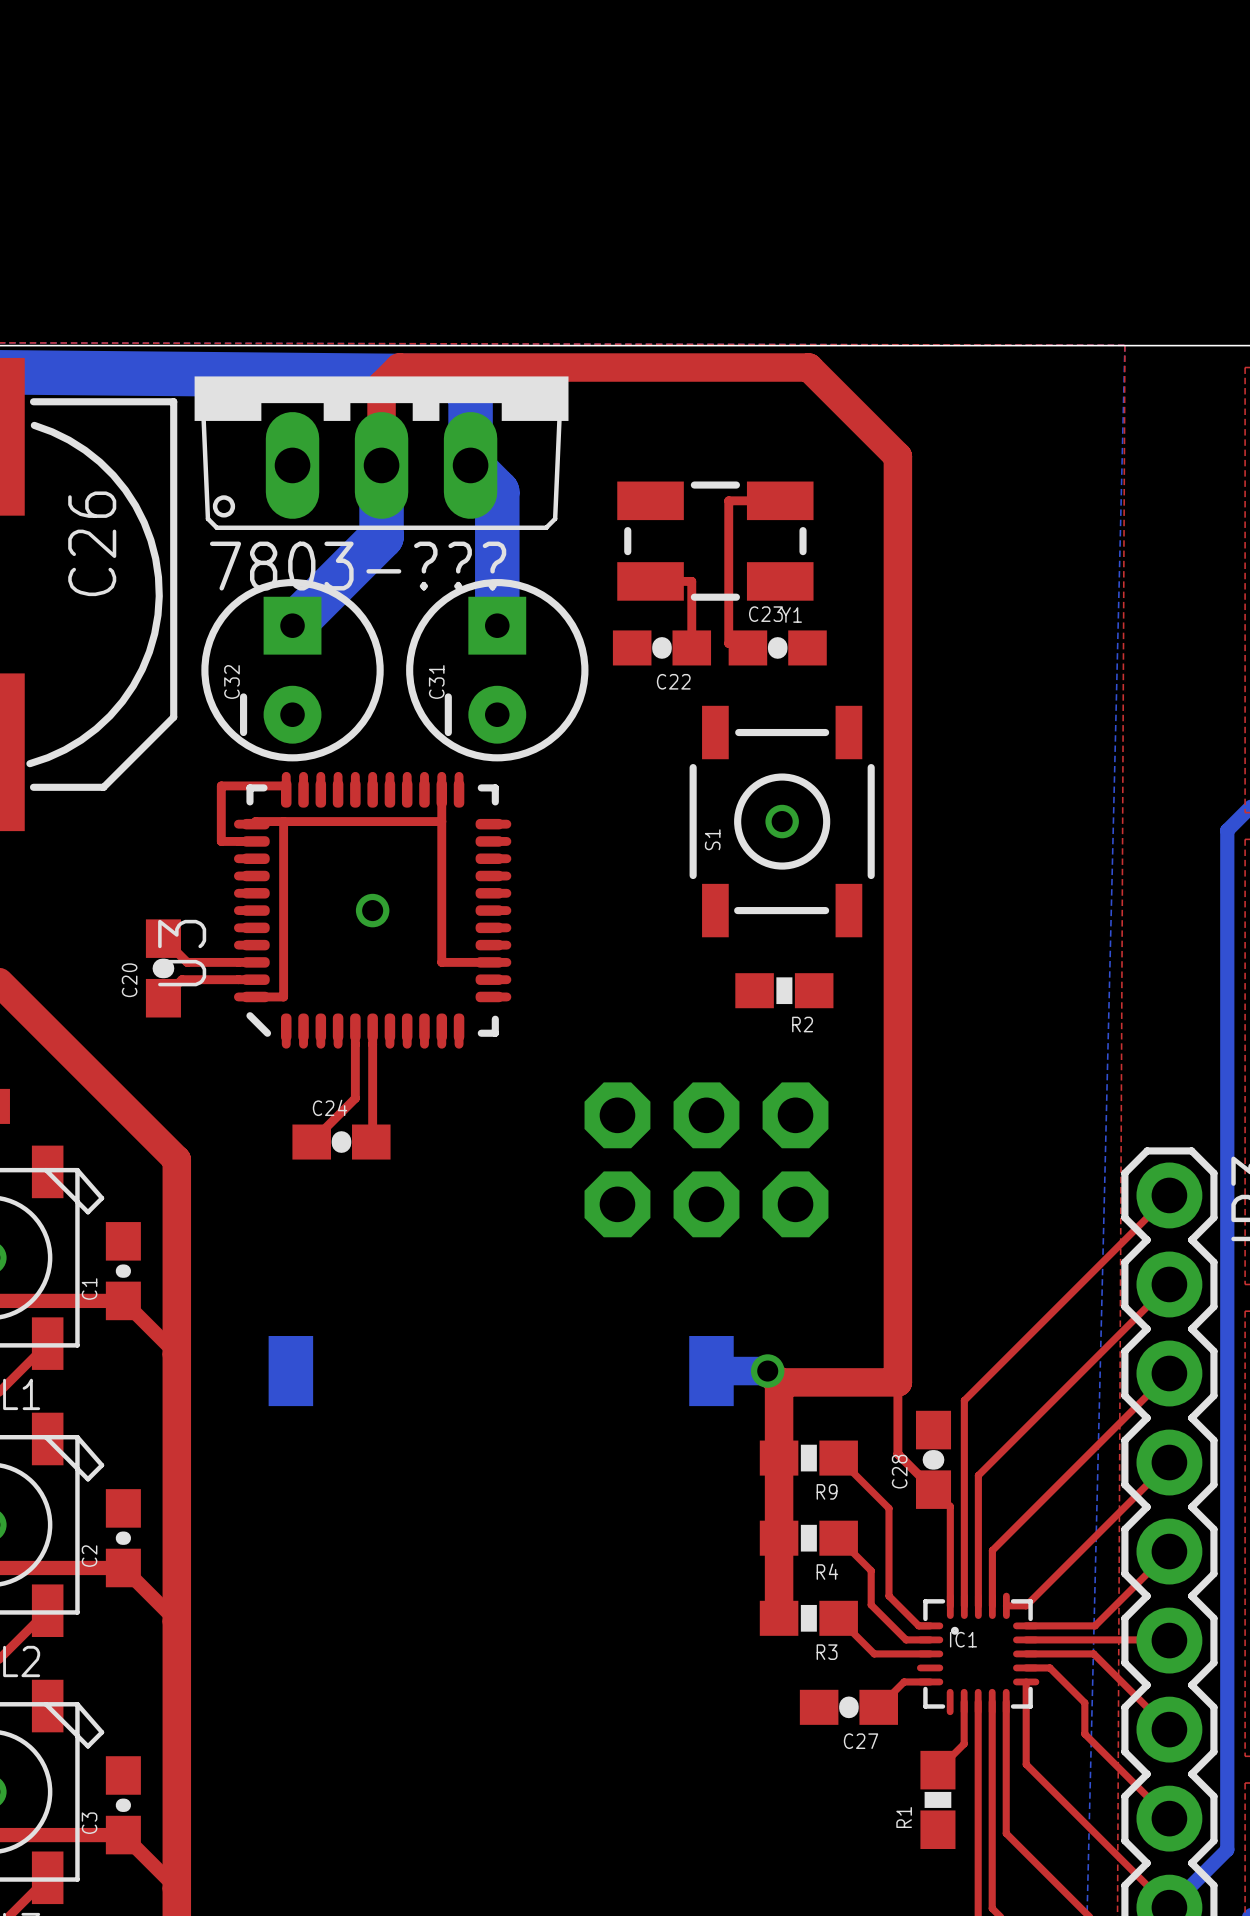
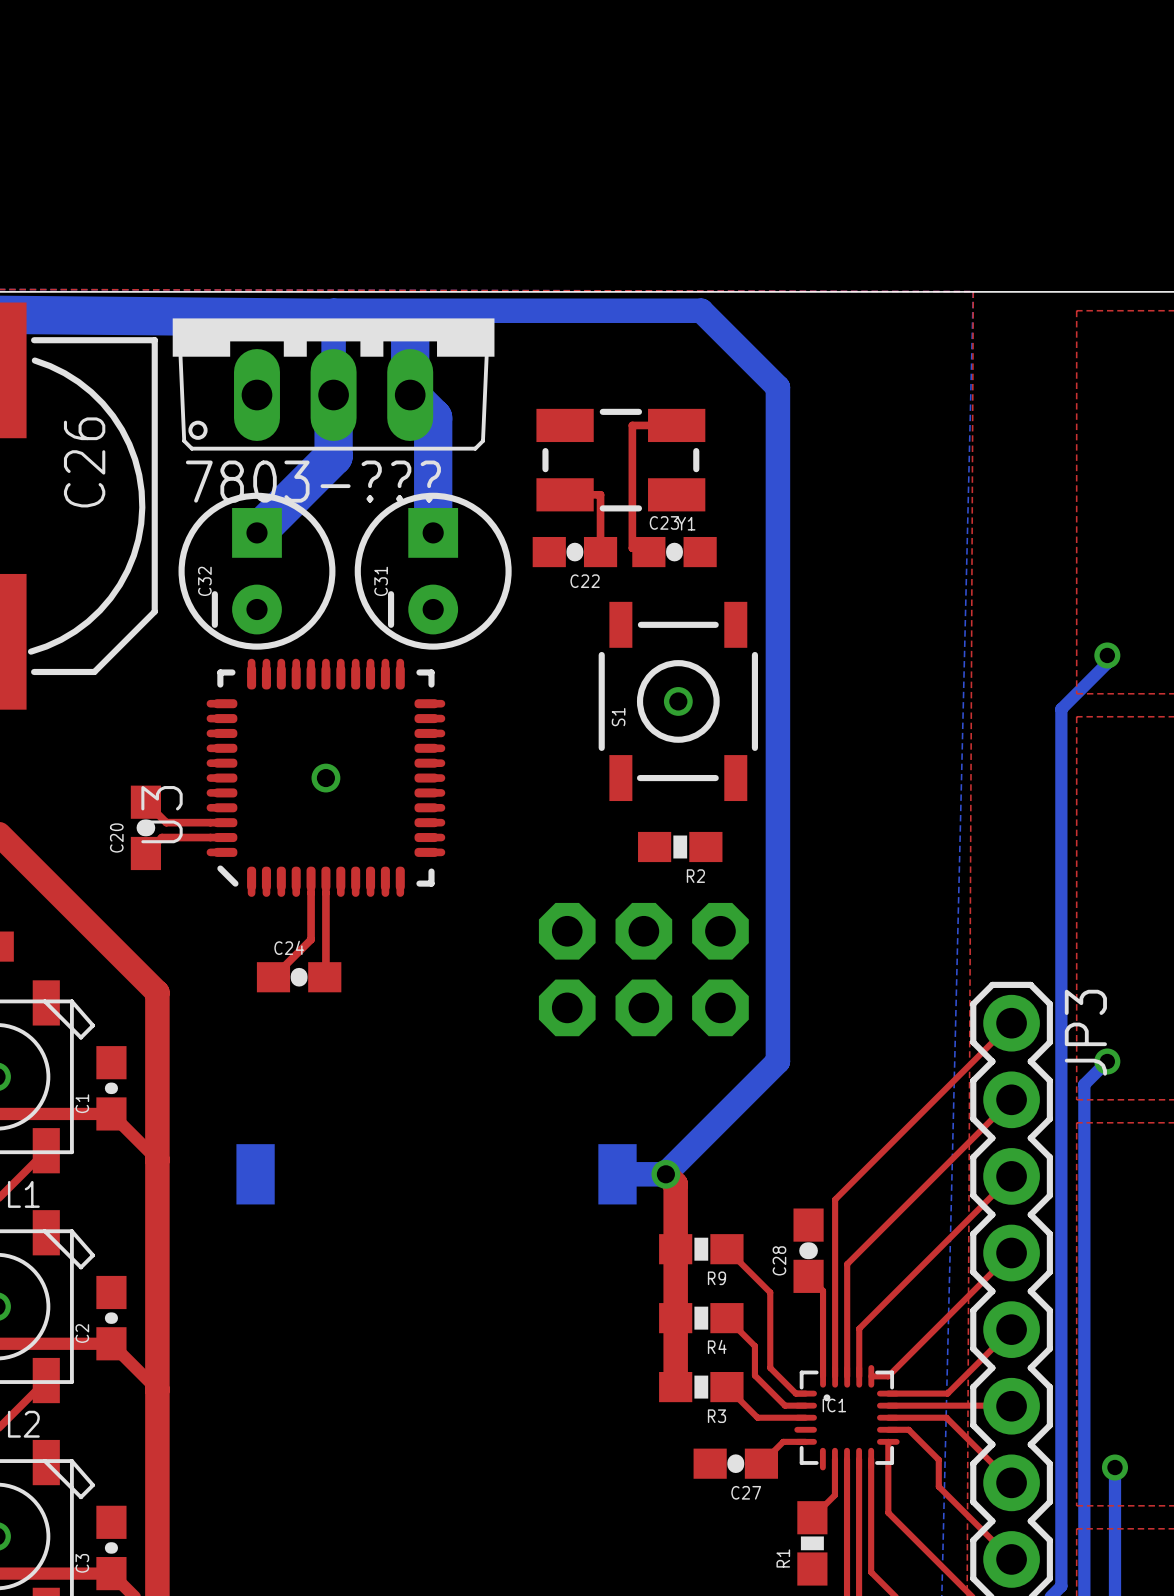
top track: (381, 465) (381, 385) (399, 367) (808, 367) (897, 456) (897, 1382) -> none
bottom track: none -> (333, 395) (333, 310) (701, 310) (777, 387) (777, 1061) (665, 1174)
top track: (286, 793) (286, 785) (221, 785) (221, 841) (255, 841) -> none
top track: (441, 793) (441, 962) (489, 962) -> none
top track: (283, 821) (283, 996) (255, 996) -> none
top track: (441, 821) (255, 821) (255, 824) -> none
part position: (706, 1159) -> (643, 969)
top track: (779, 1382) (897, 1382) -> none
top track: (897, 1382) (897, 1454) (933, 1489) -> none

